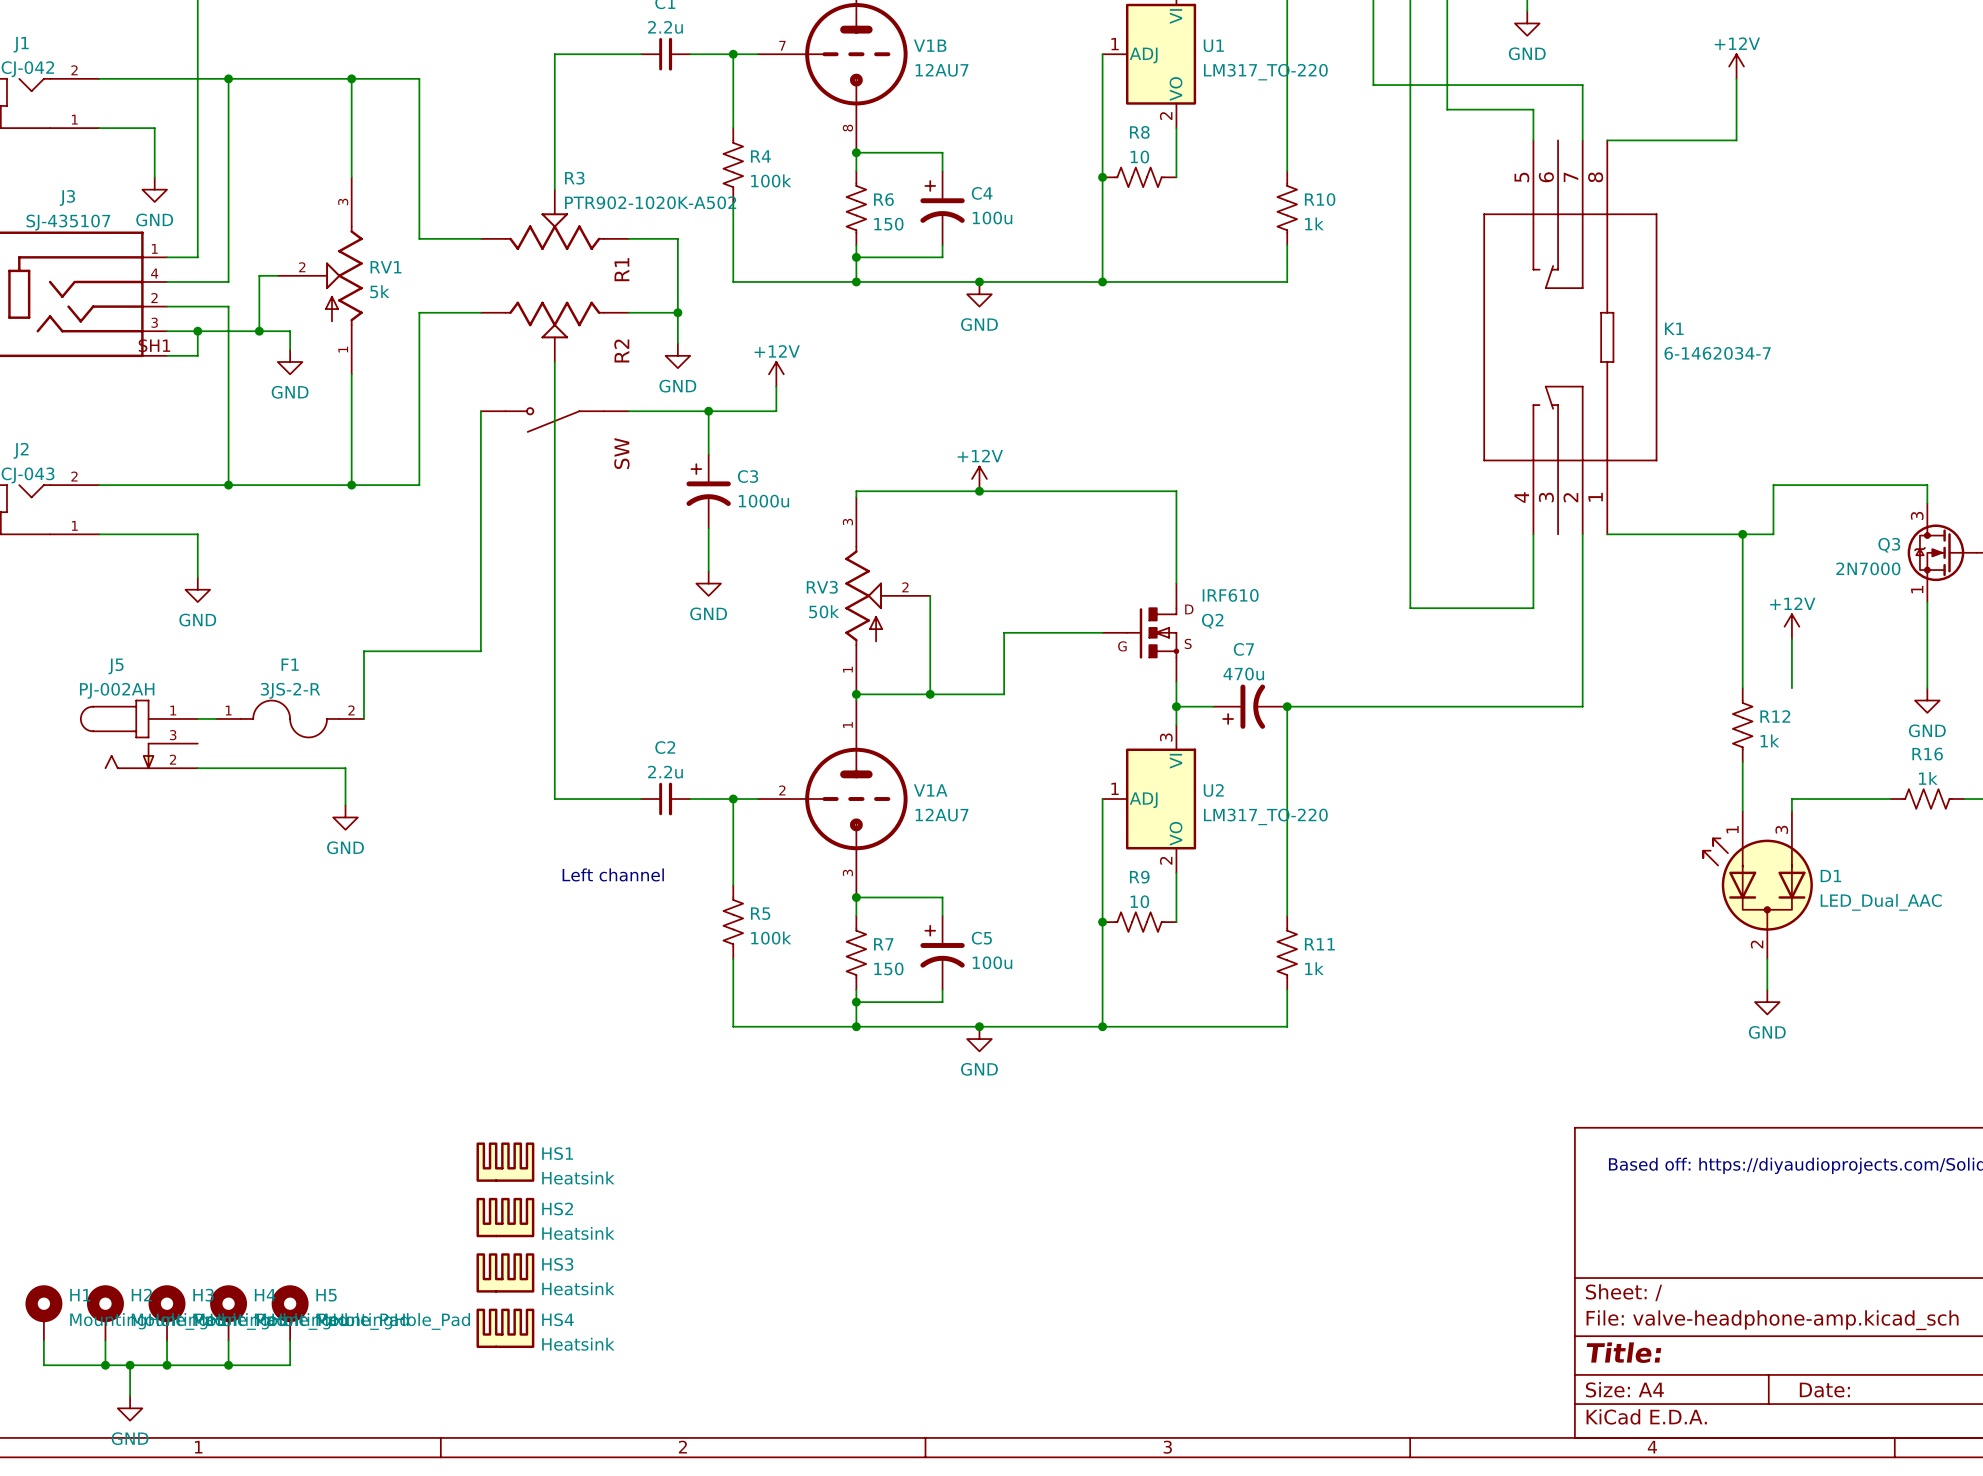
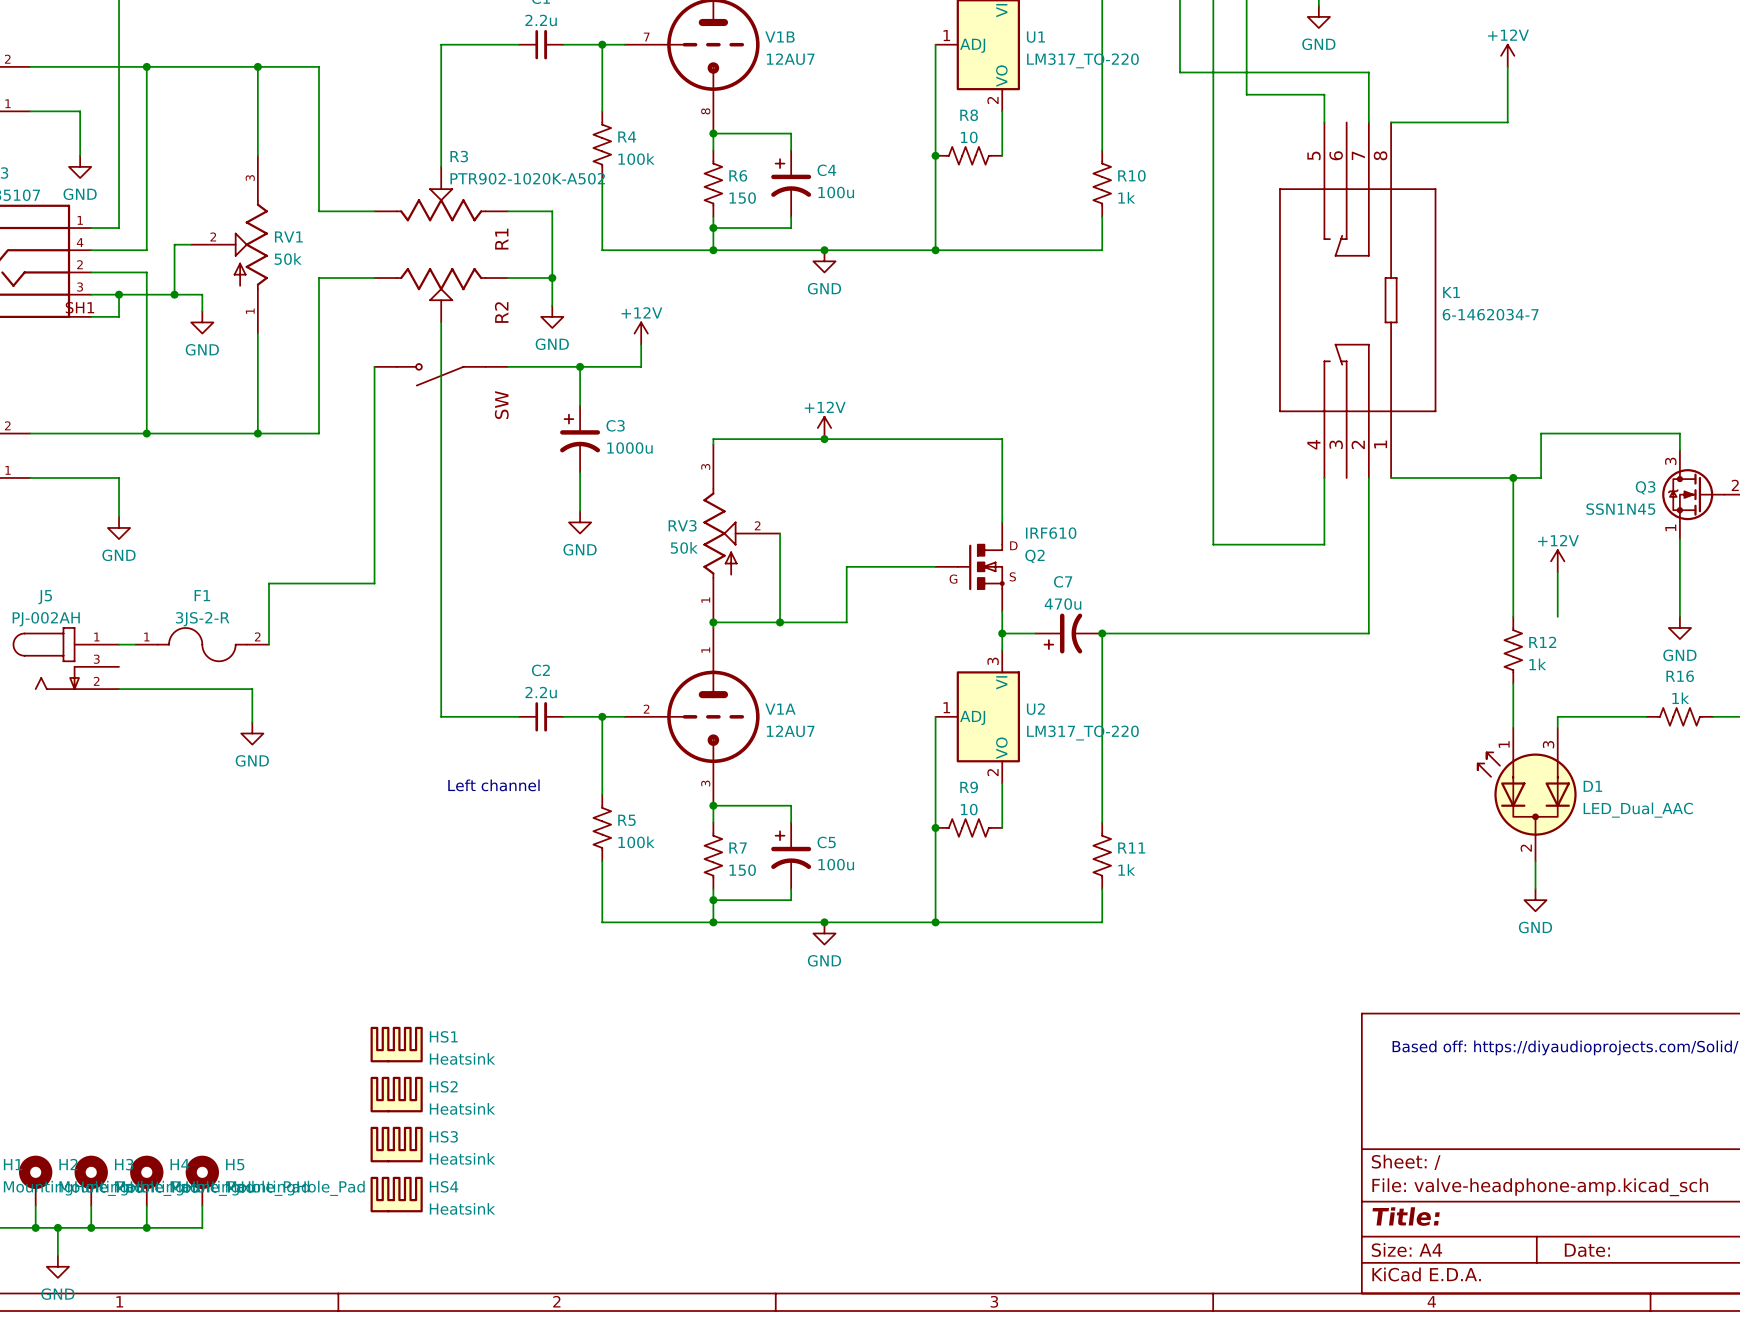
RV1 value: 5k (379, 291) -> 50k (288, 259)
Q3 value: 2N7000 (1868, 568) -> SSN1N45 (1620, 509)

